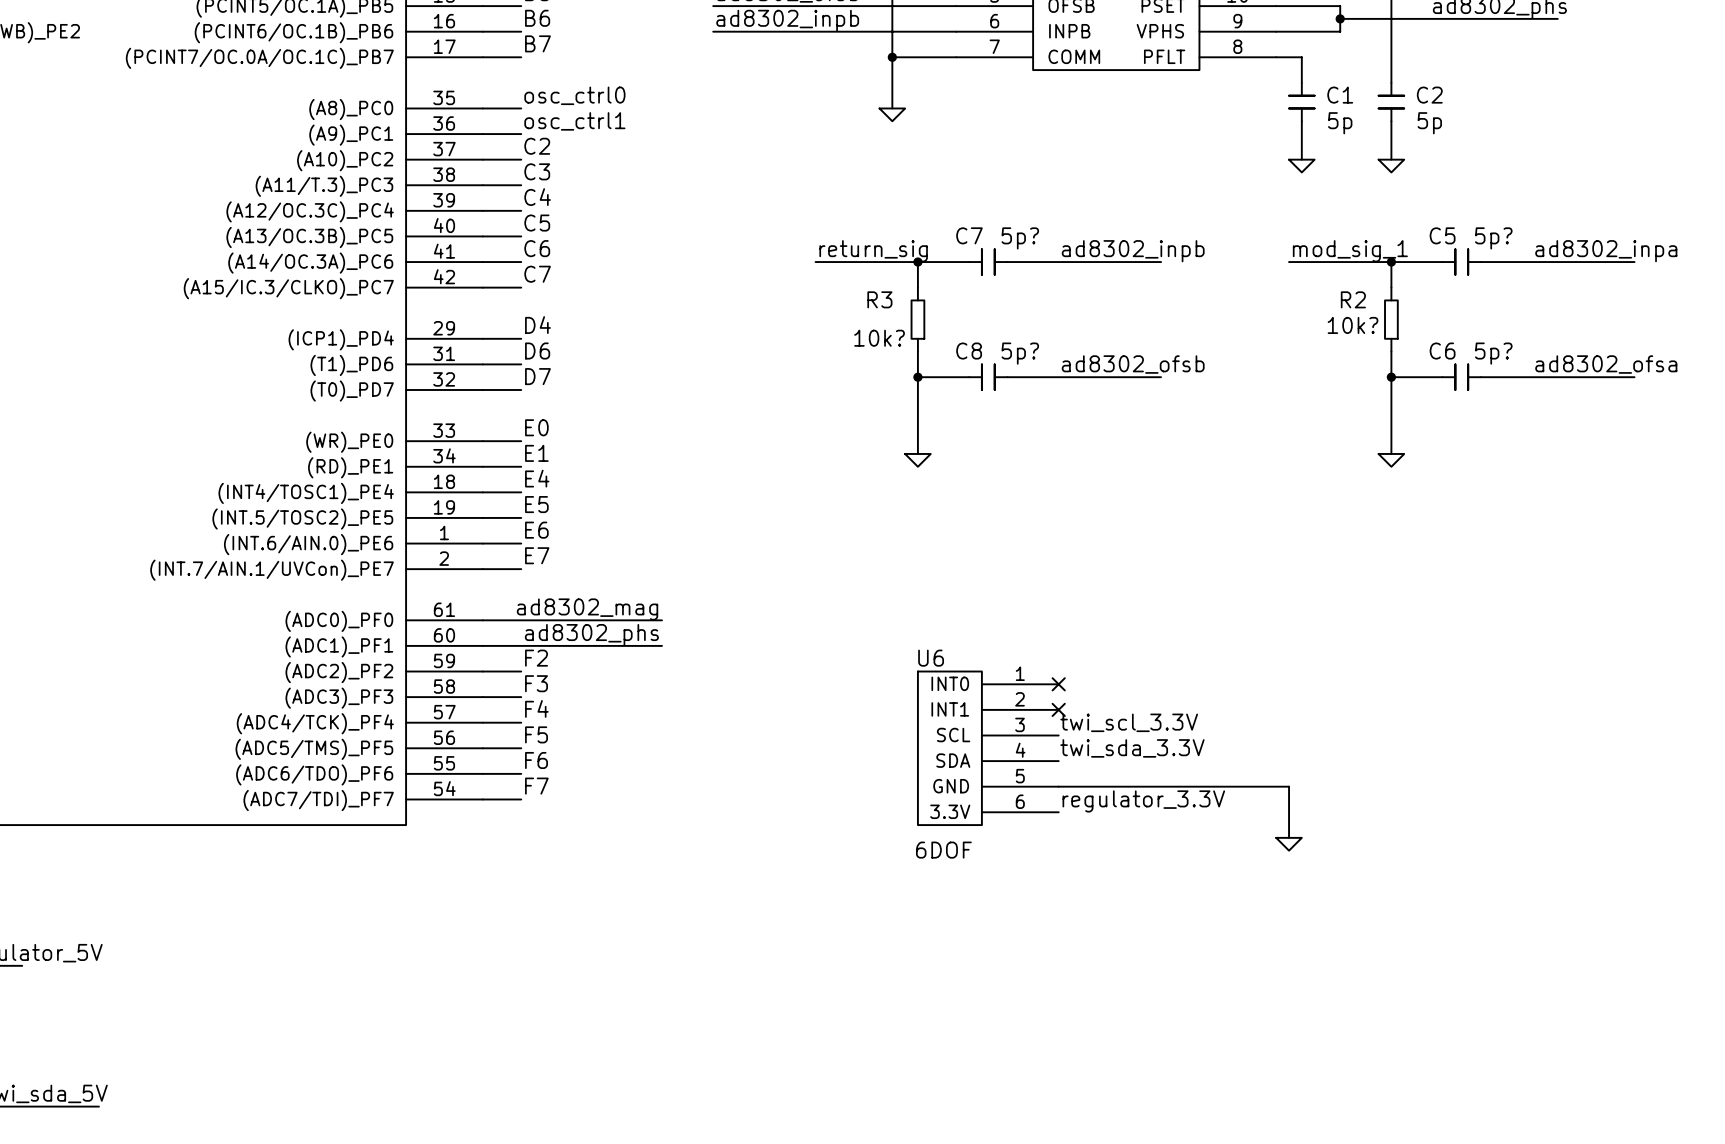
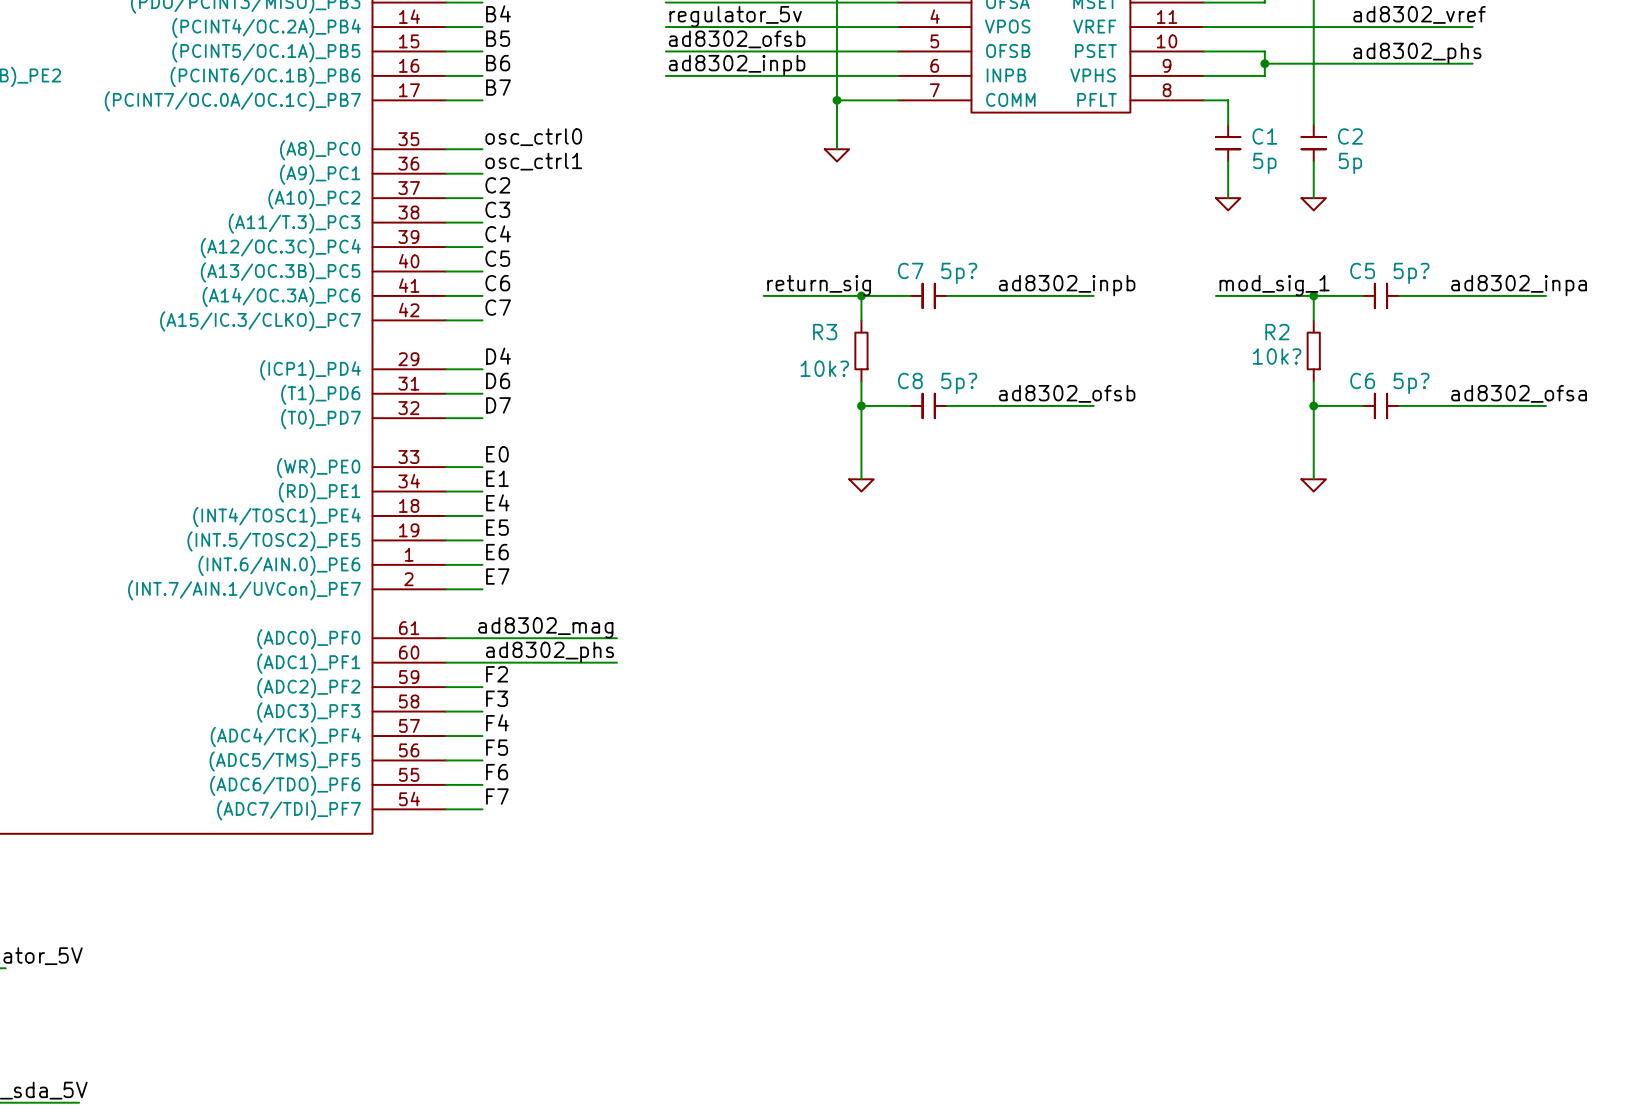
no-connect mark: (1058, 684) -> none
no-connect mark: (1058, 709) -> none
label: twi_scl_3.3V (1129, 722) -> none
U6: 6DOF (988, 748) -> none
label: twi_sda_3.3V (1132, 748) -> none
wire: (1058, 786) (1289, 786) (1289, 837) -> none
label: regulator_3.3V (1143, 801) -> none
power symbol: (1289, 844) -> none

